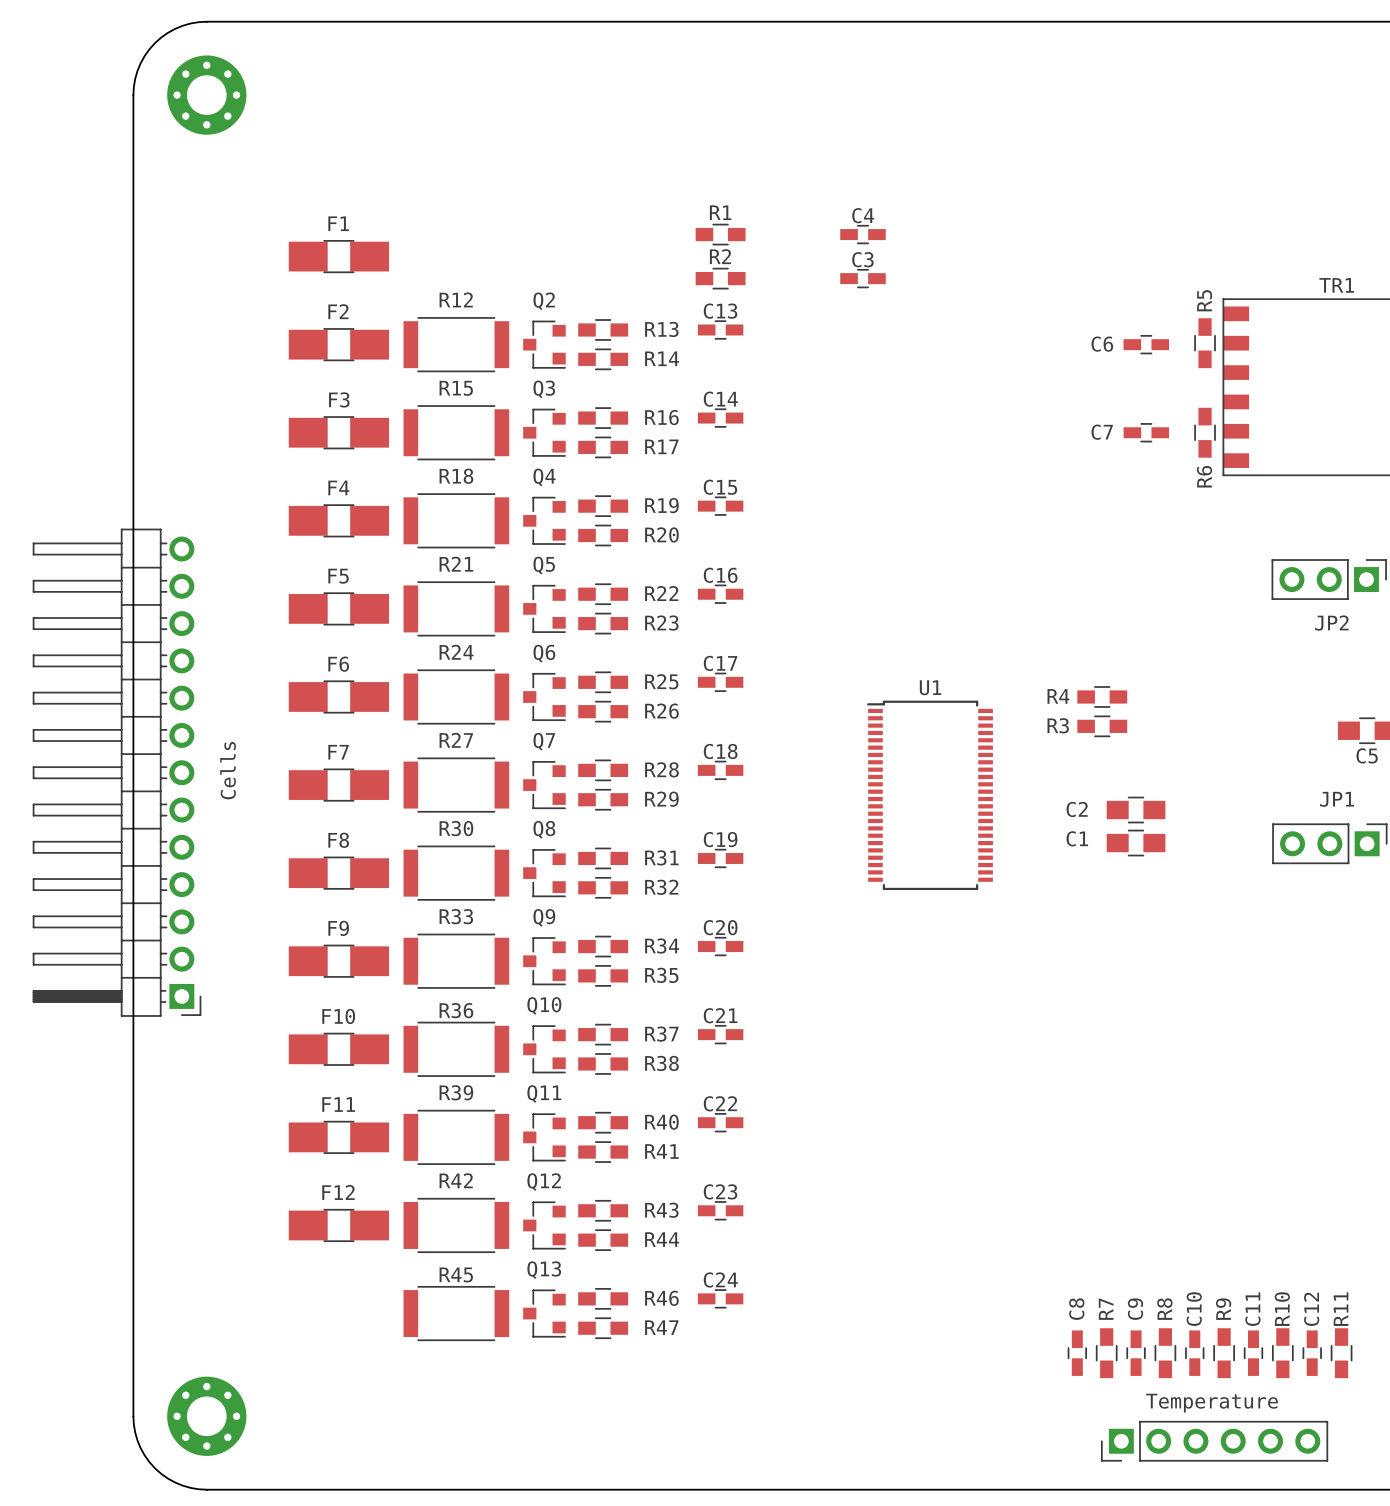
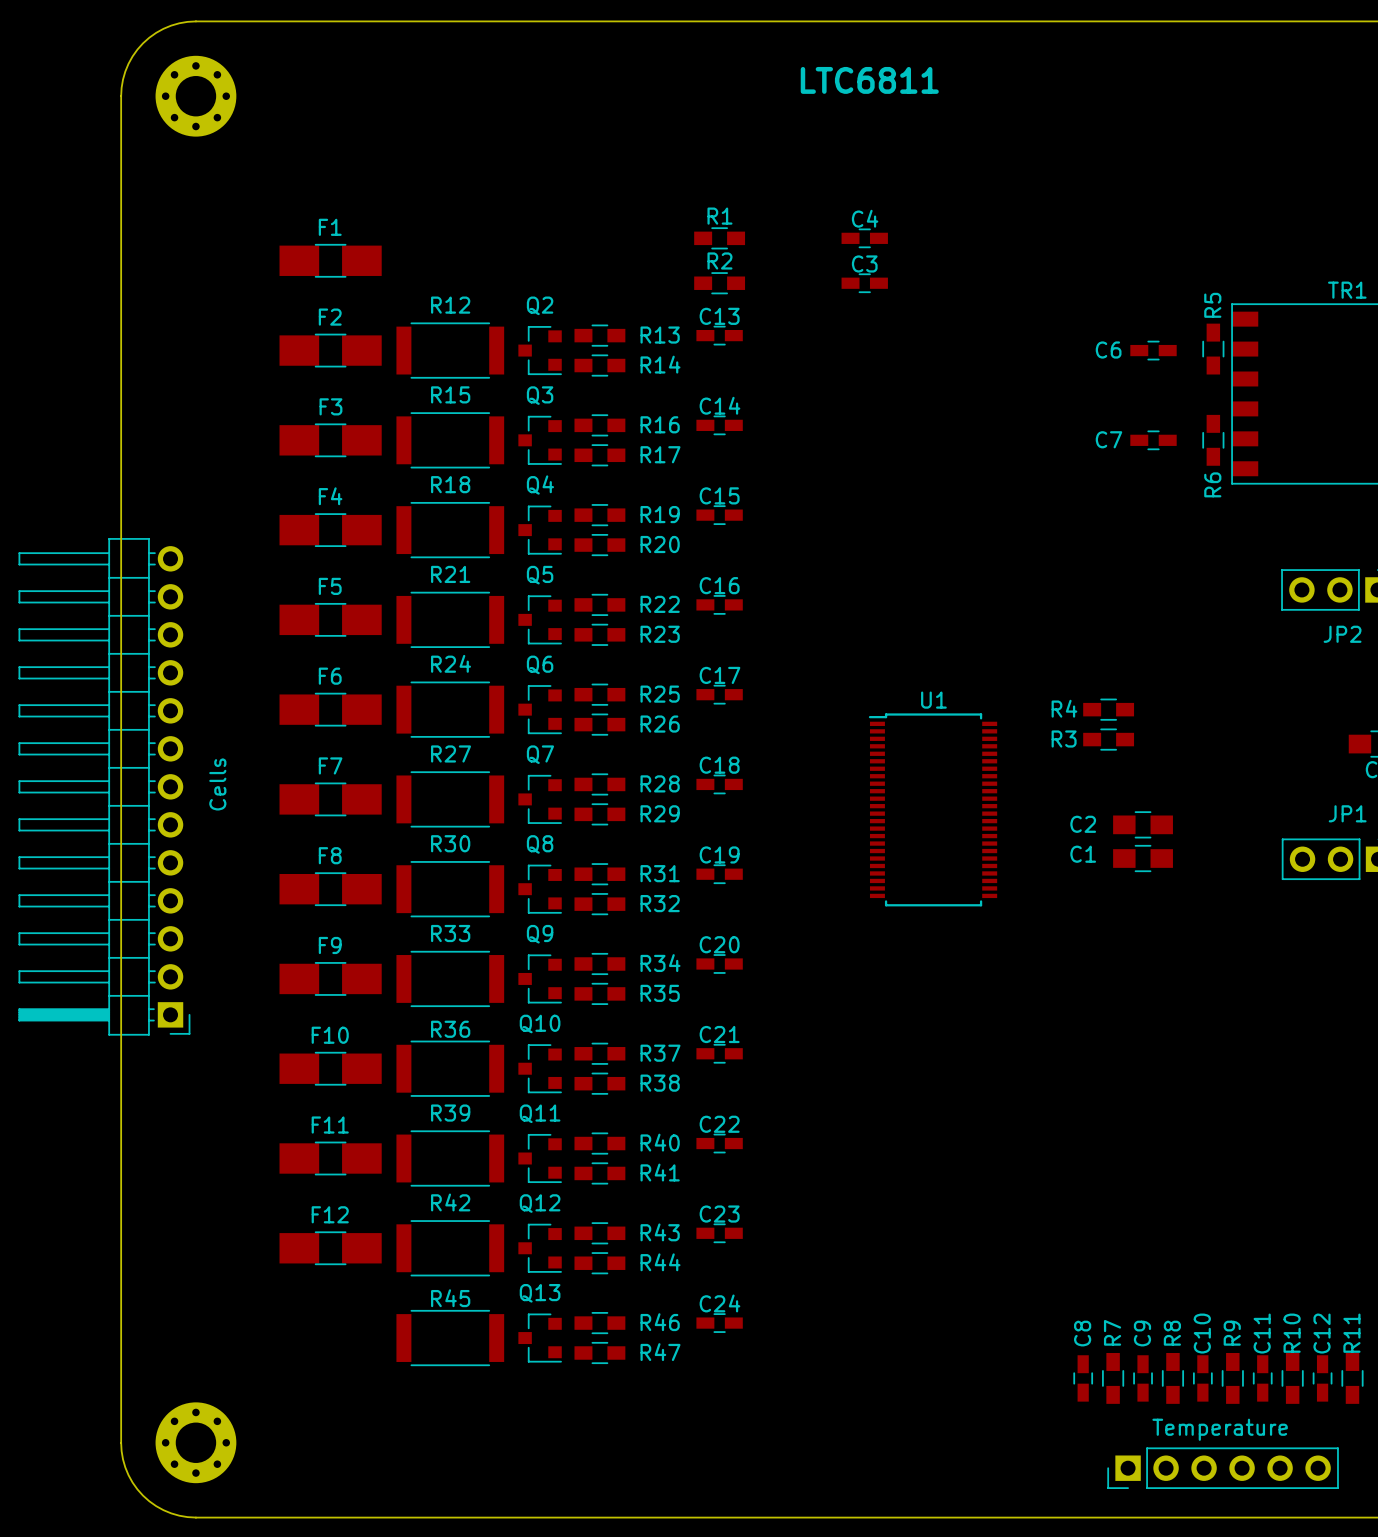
text: none -> LTC6811 (869, 80)

